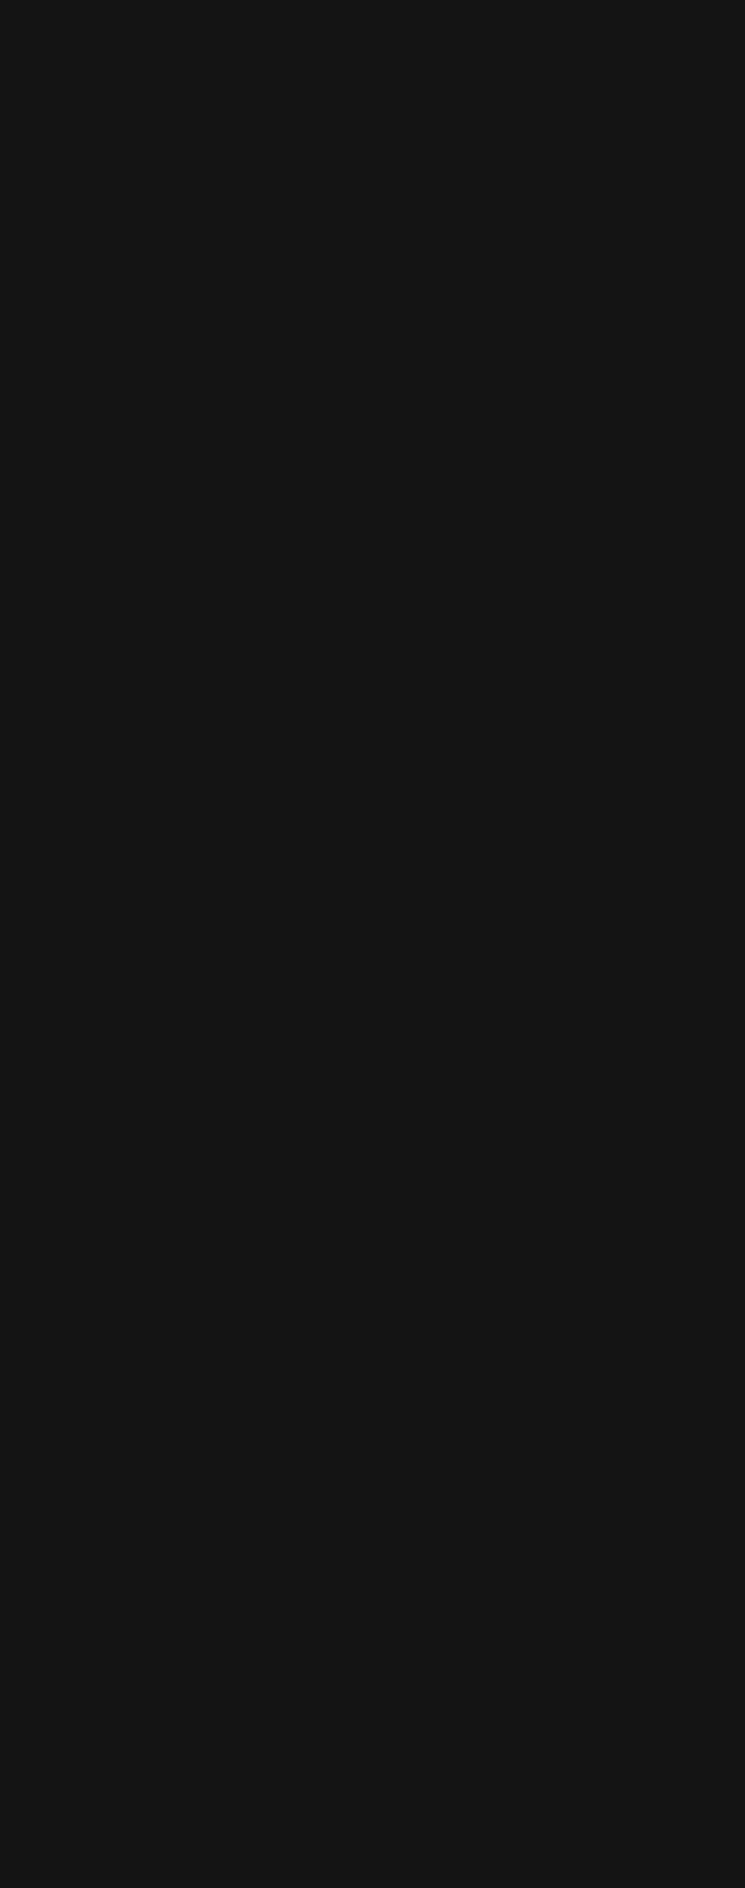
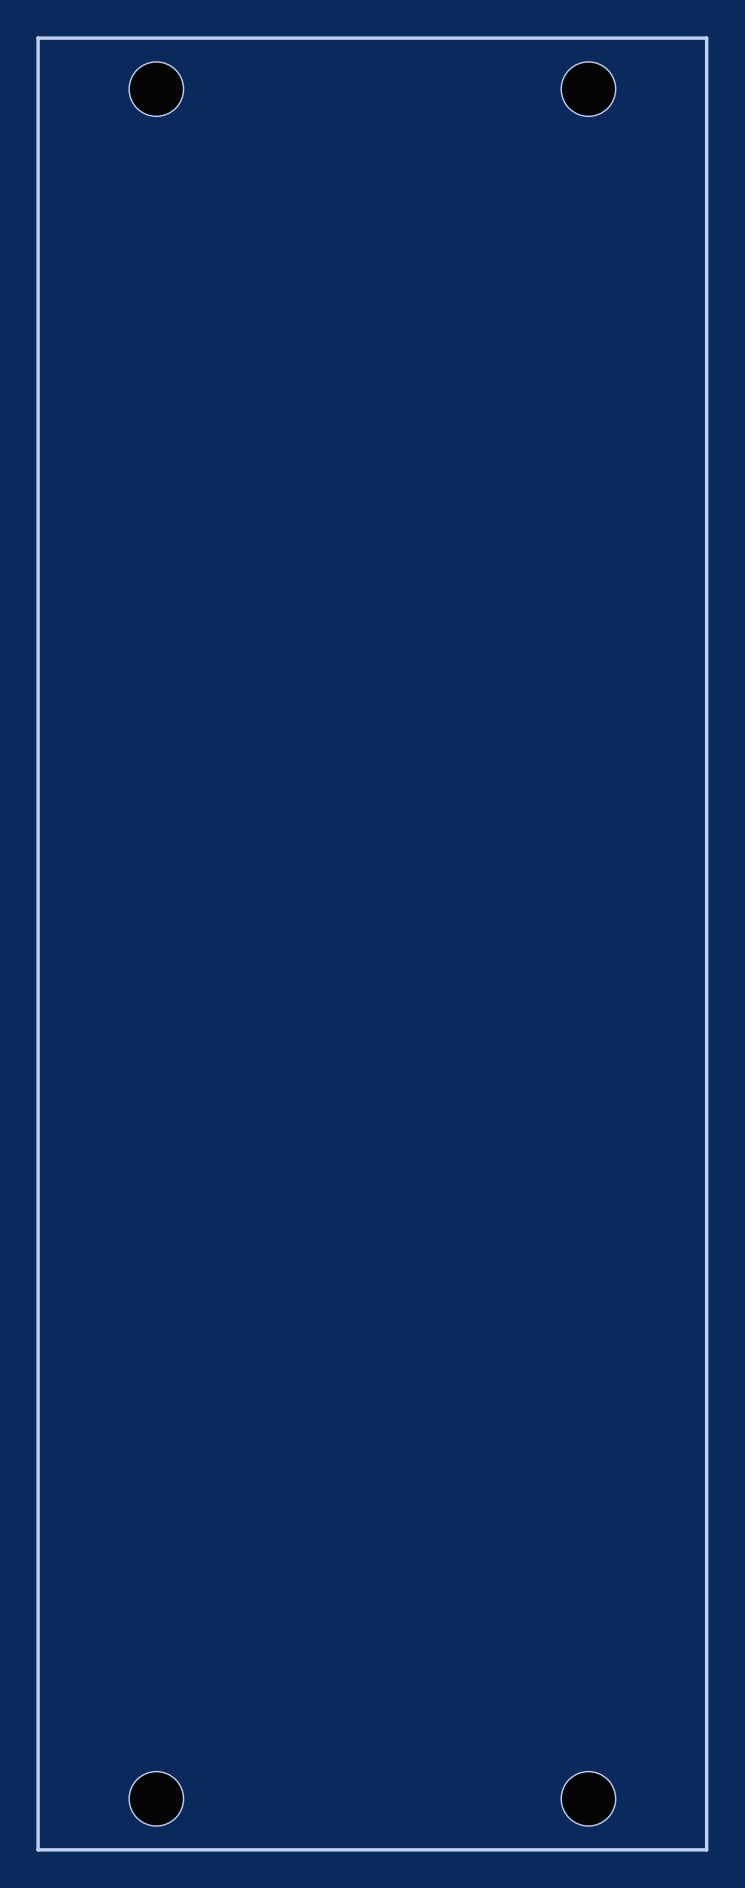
board edge: none -> (706, 38) (38, 38) (38, 1849) (706, 1849) (706, 38)
part: none -> (156, 89)
part: none -> (588, 89)
part: none -> (156, 1798)
part: none -> (588, 1798)

